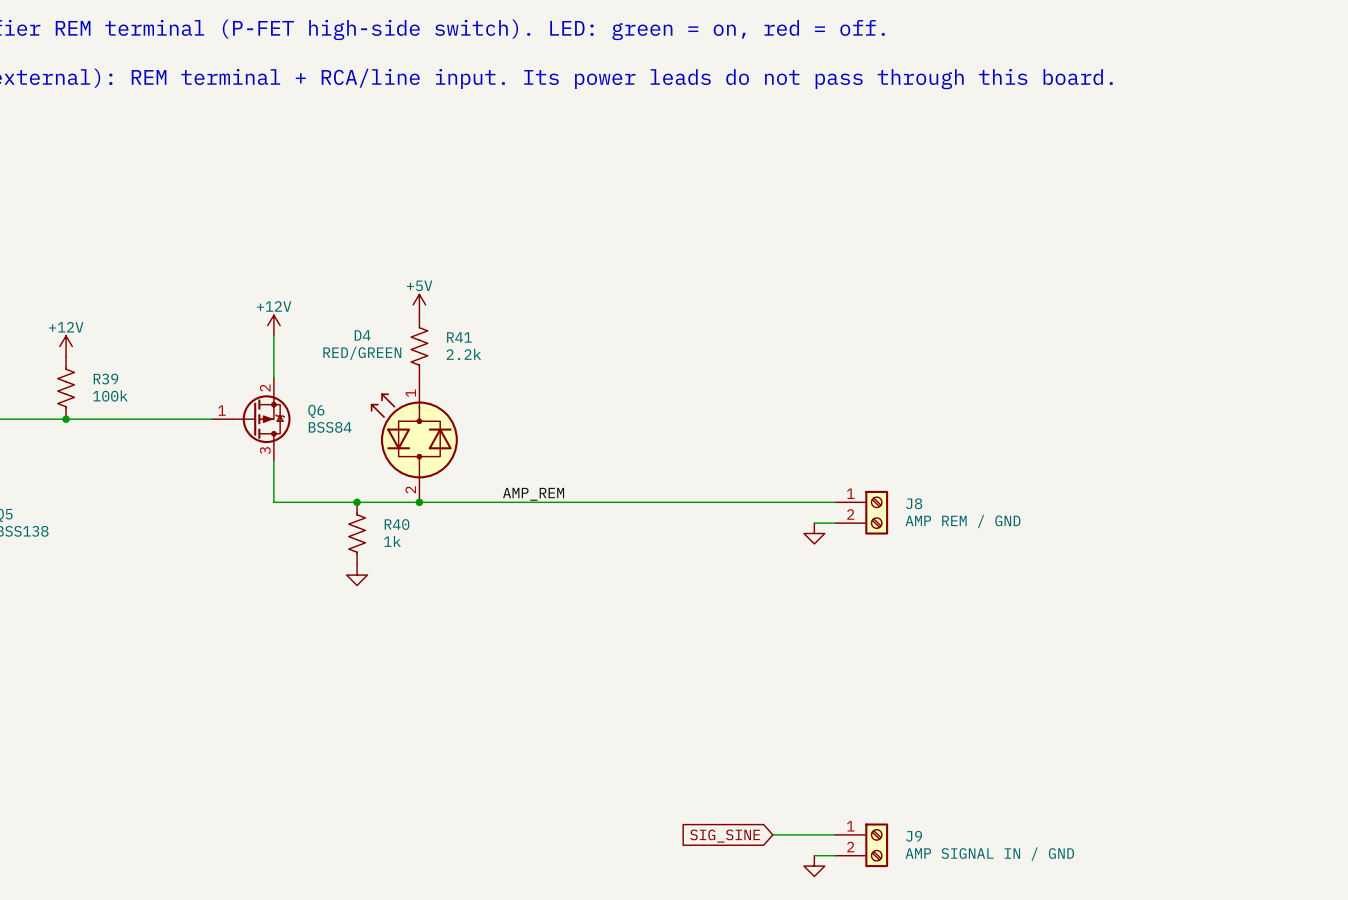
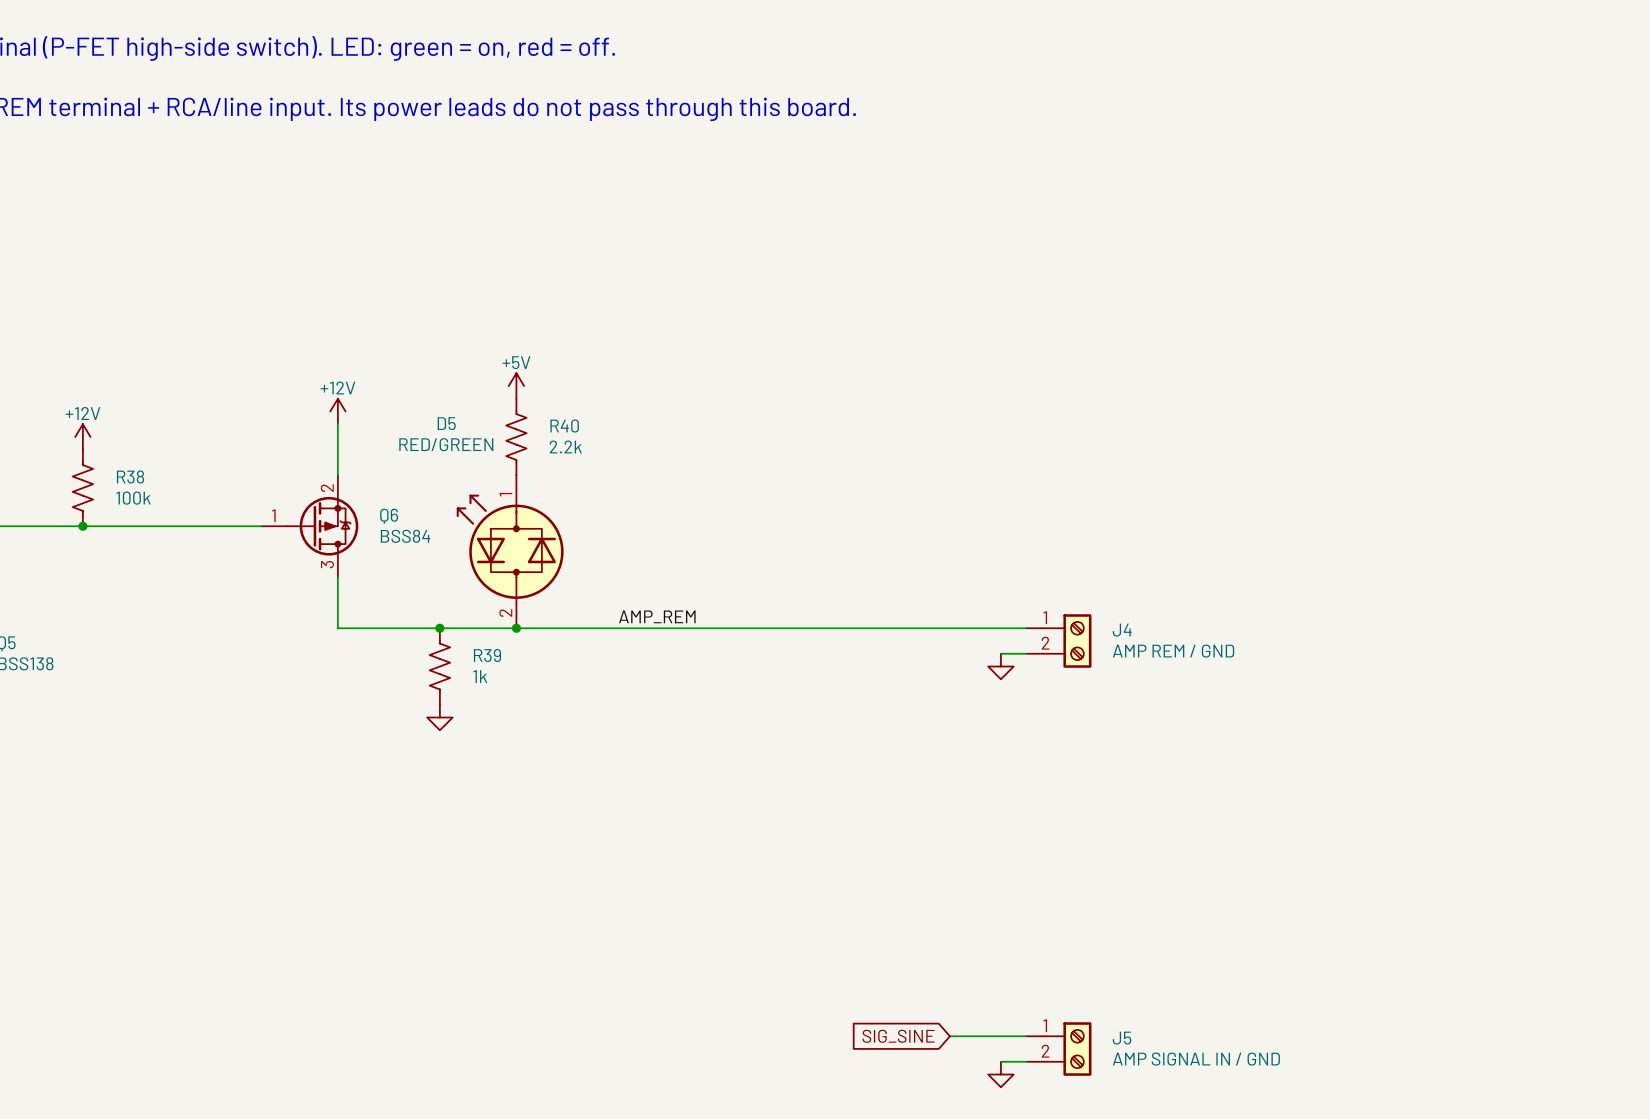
D4 name: D4 (362, 335) -> D5 (446, 423)
R41 name: R41 (459, 337) -> R40 (564, 425)
R39 name: R39 (105, 379) -> R38 (130, 476)
J8 name: J8 (914, 503) -> J4 (1122, 630)
R40 name: R40 (397, 524) -> R39 (487, 655)
J9 name: J9 (914, 836) -> J5 (1122, 1038)

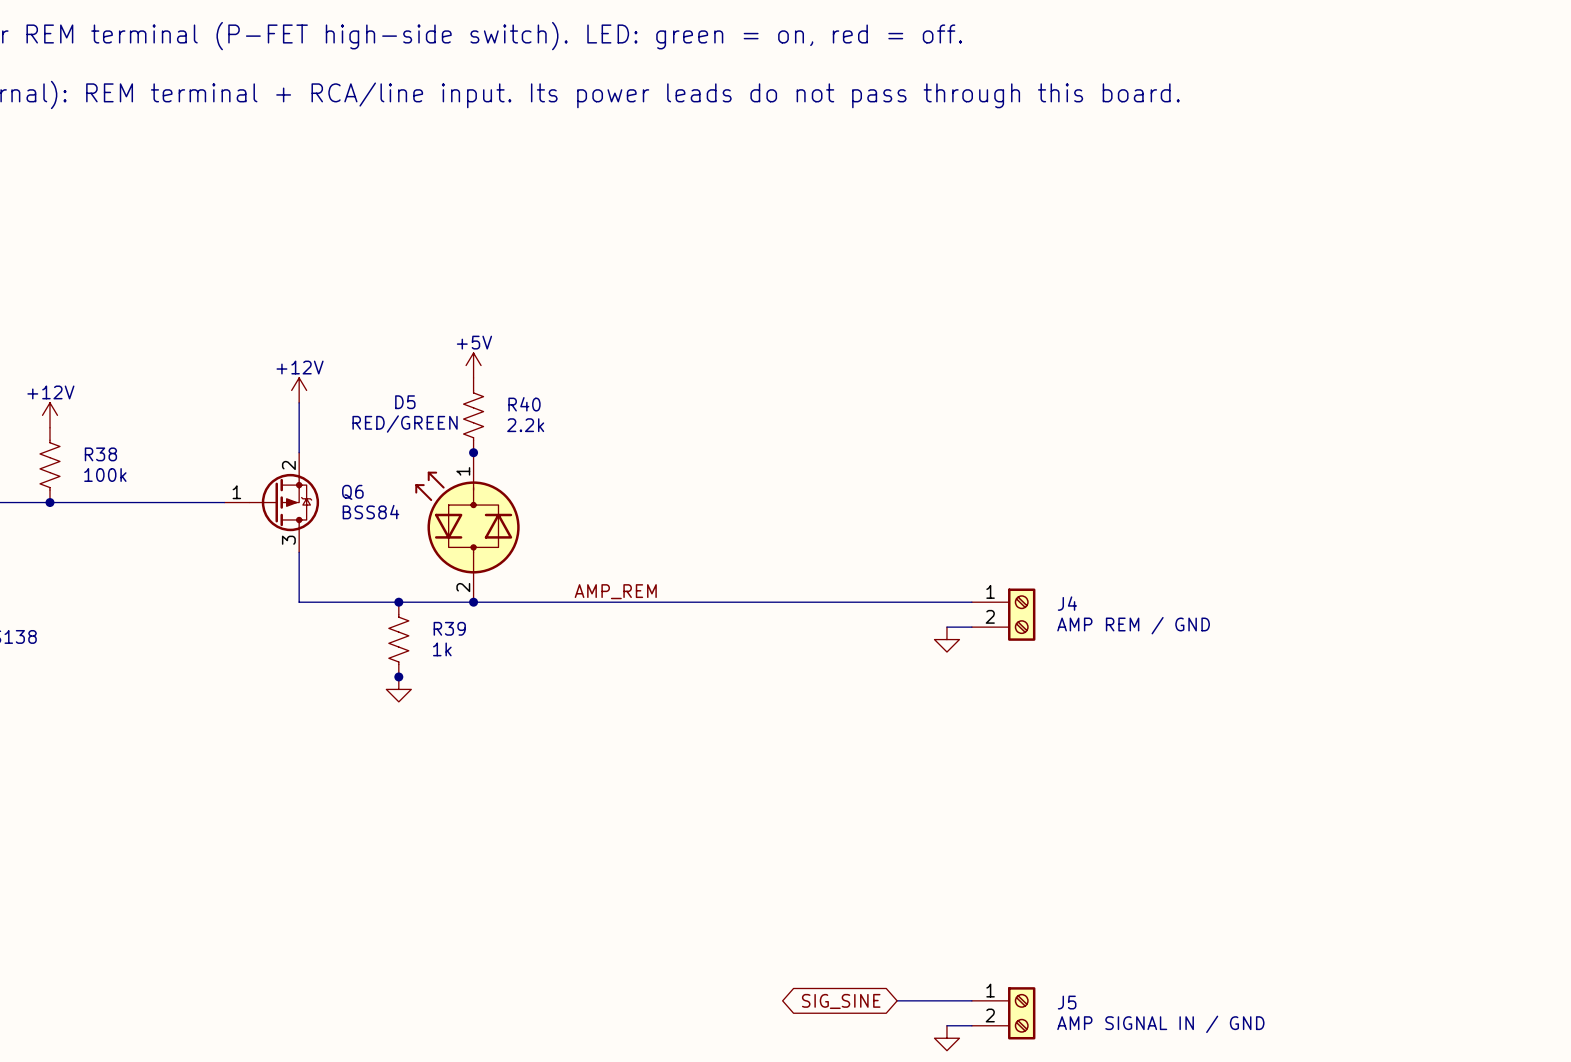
junction: none -> (473, 452)
junction: none -> (398, 676)
global label shape: input (898, 1036) -> bidirectional (841, 1001)

